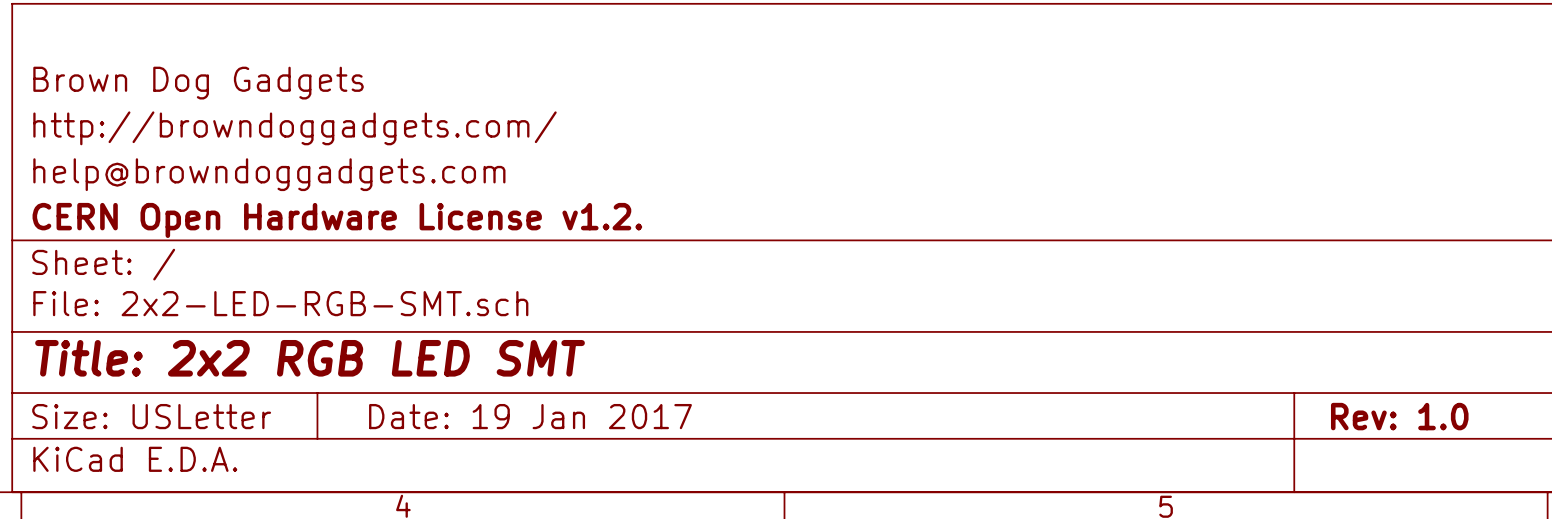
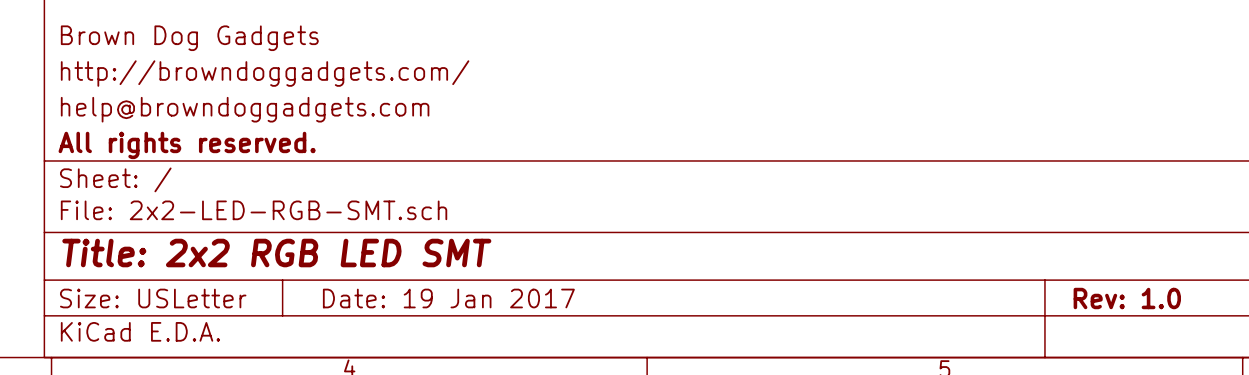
title block: CERN Open Hardware License v1.2. (337, 220) -> All rights reserved. (187, 145)

